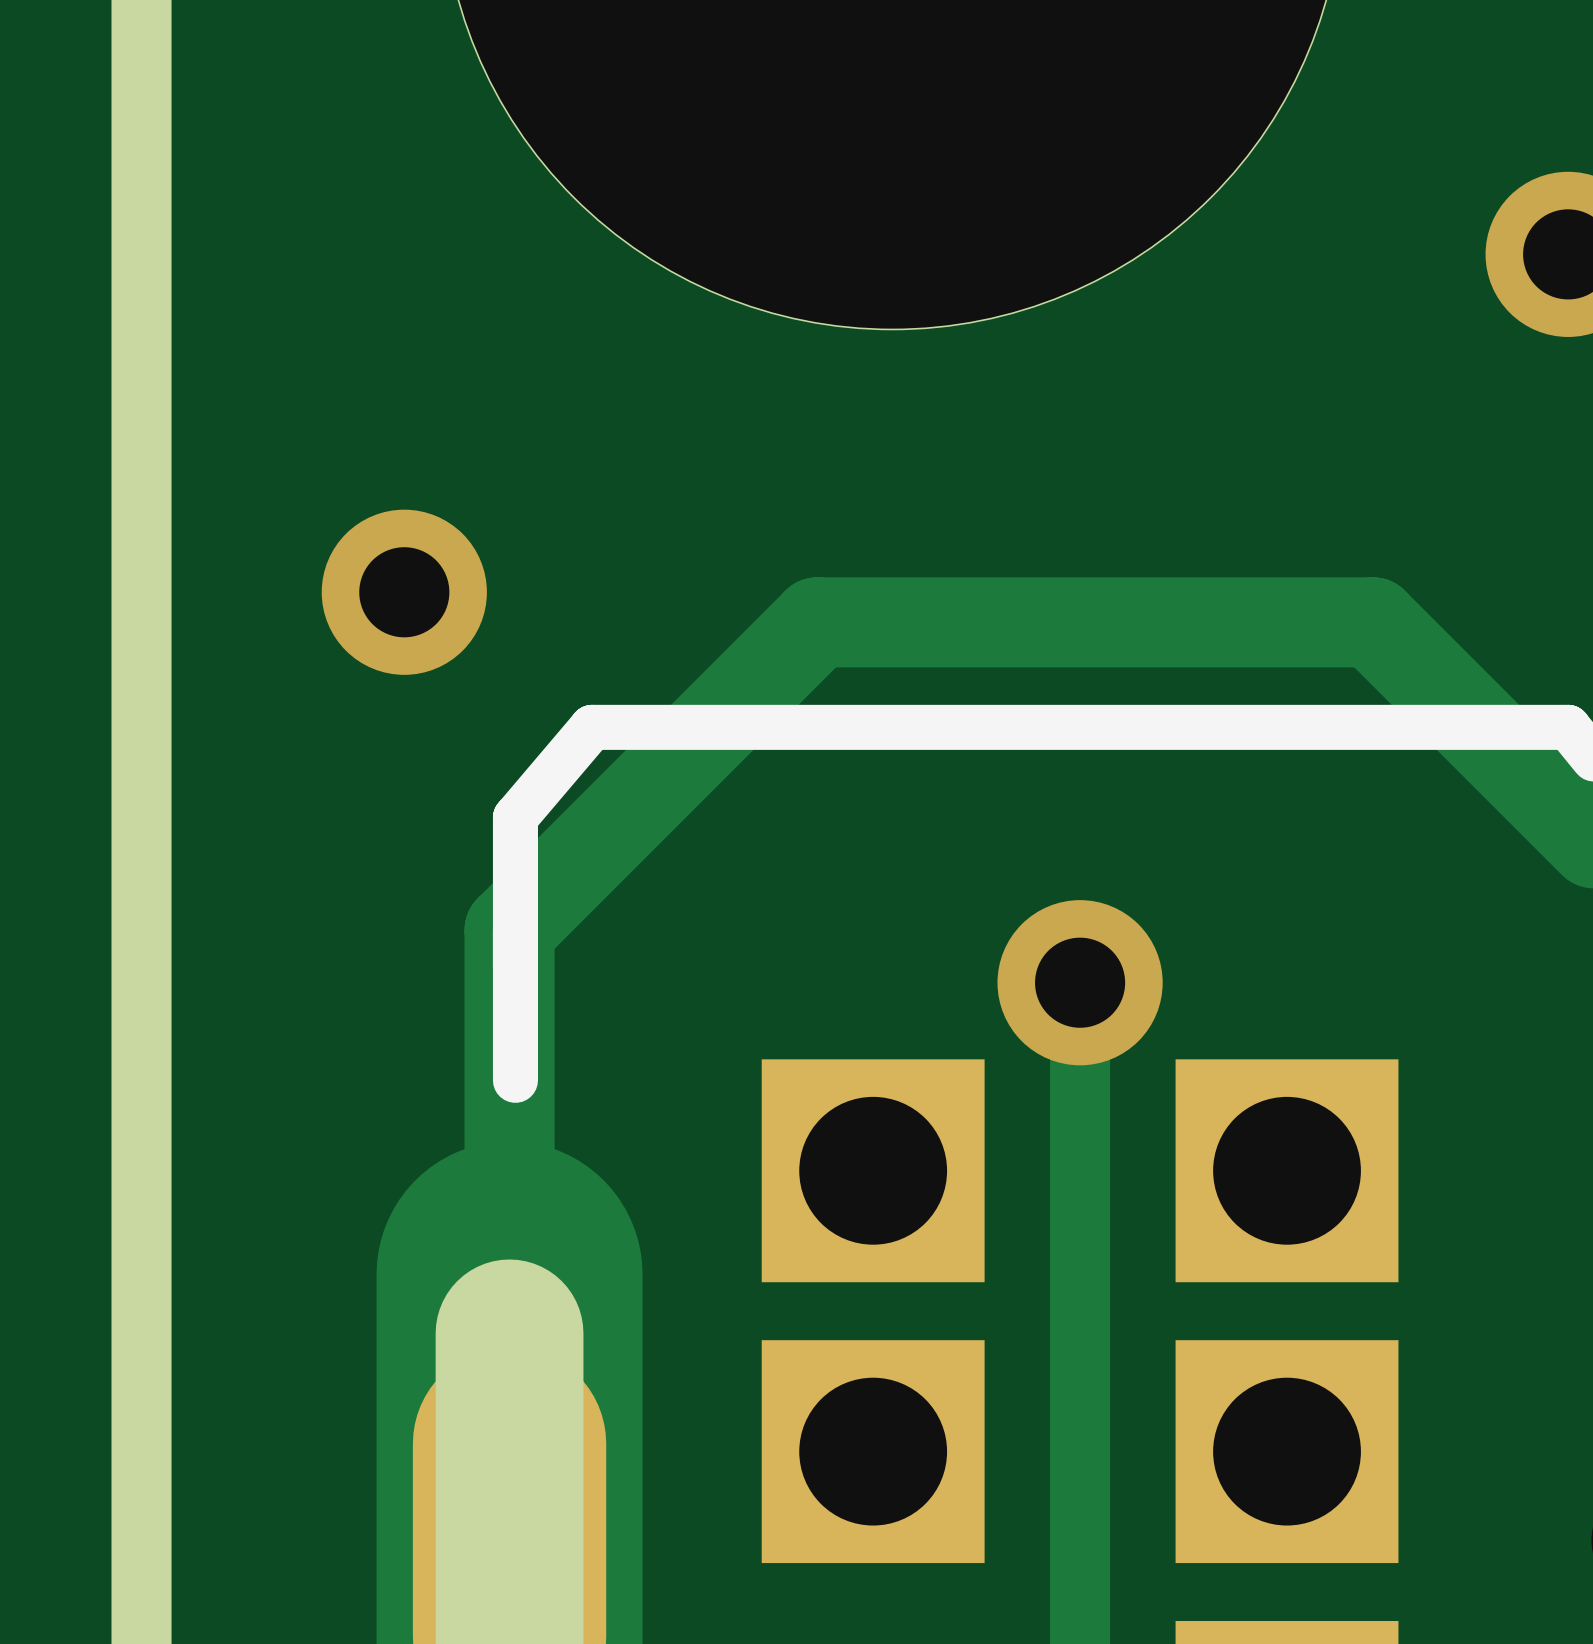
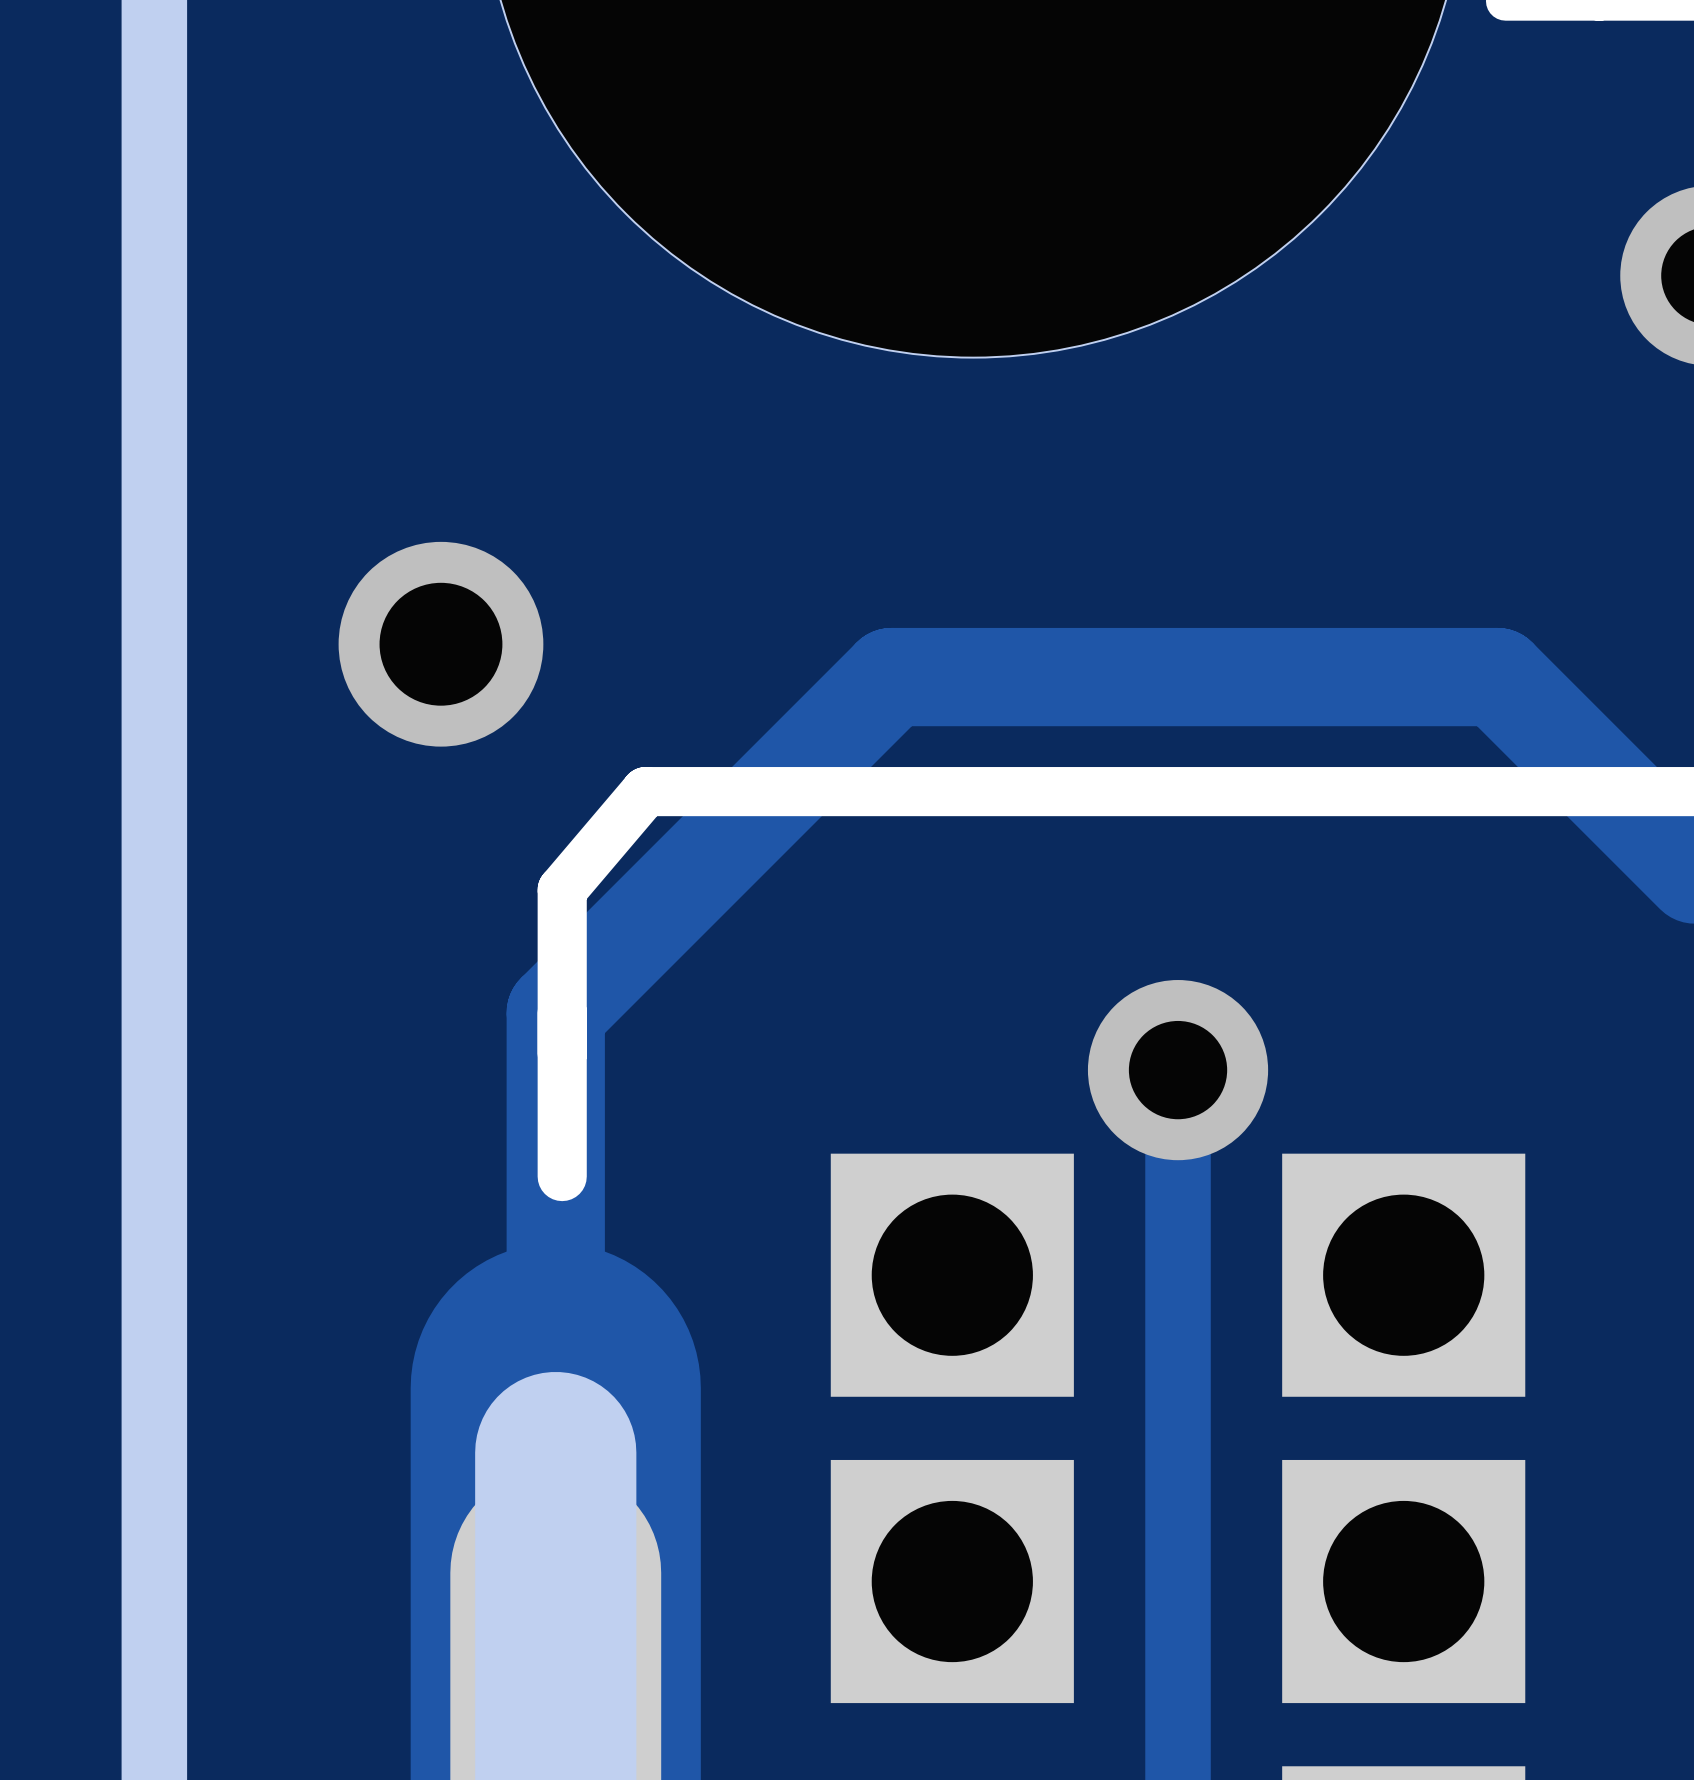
via size: [321, 509, 487, 675] -> [338, 541, 544, 747]

